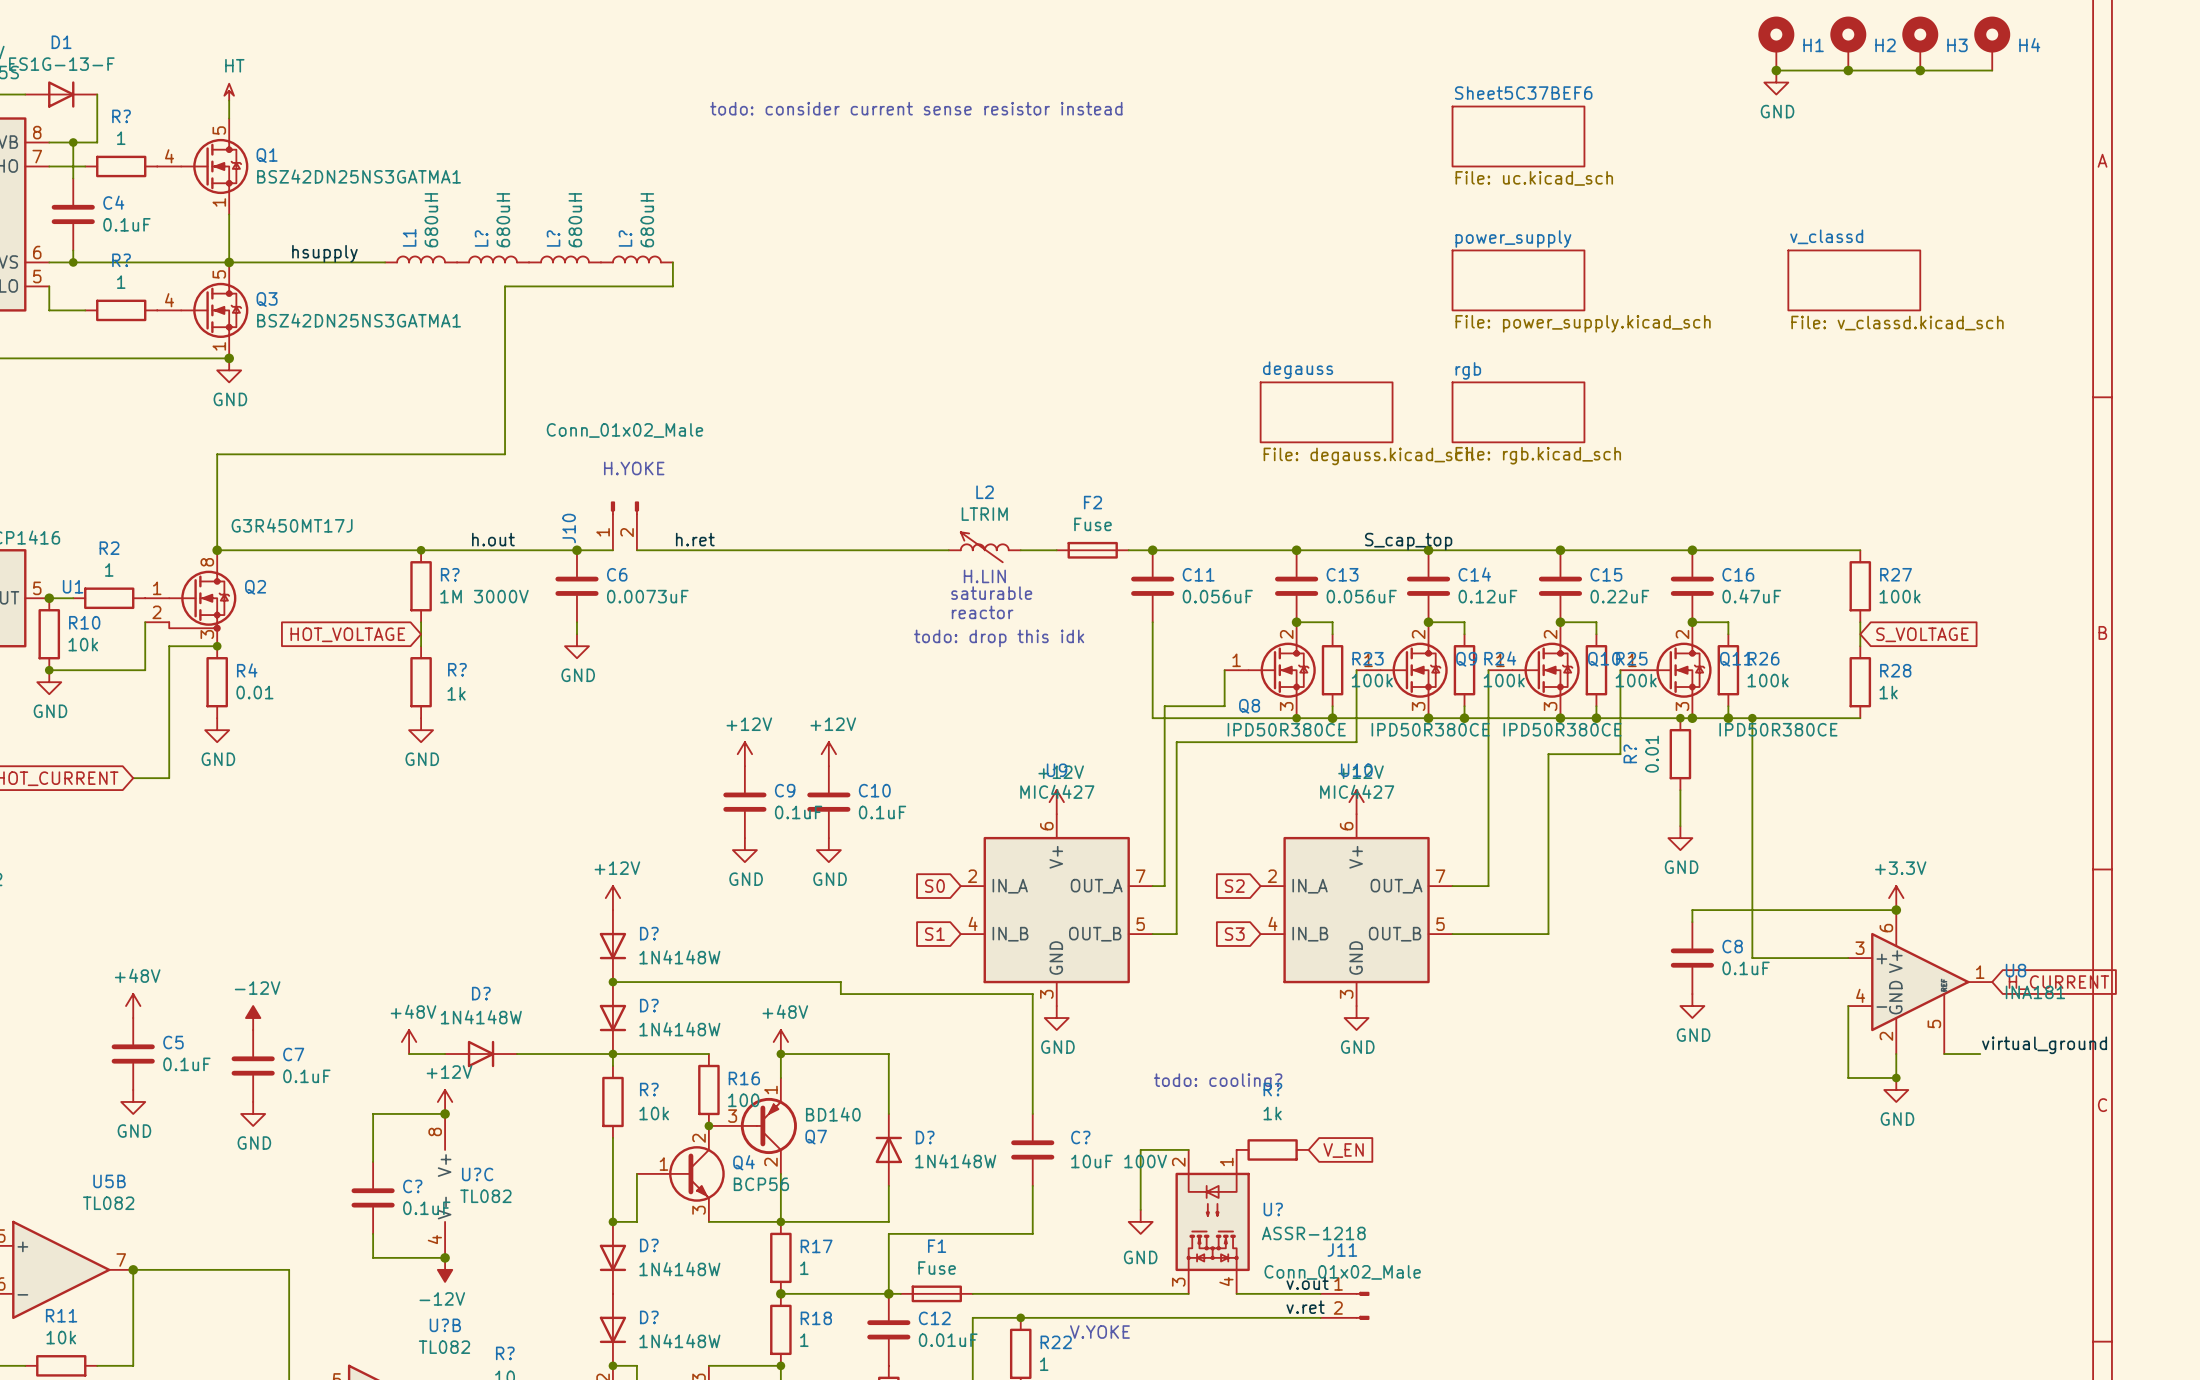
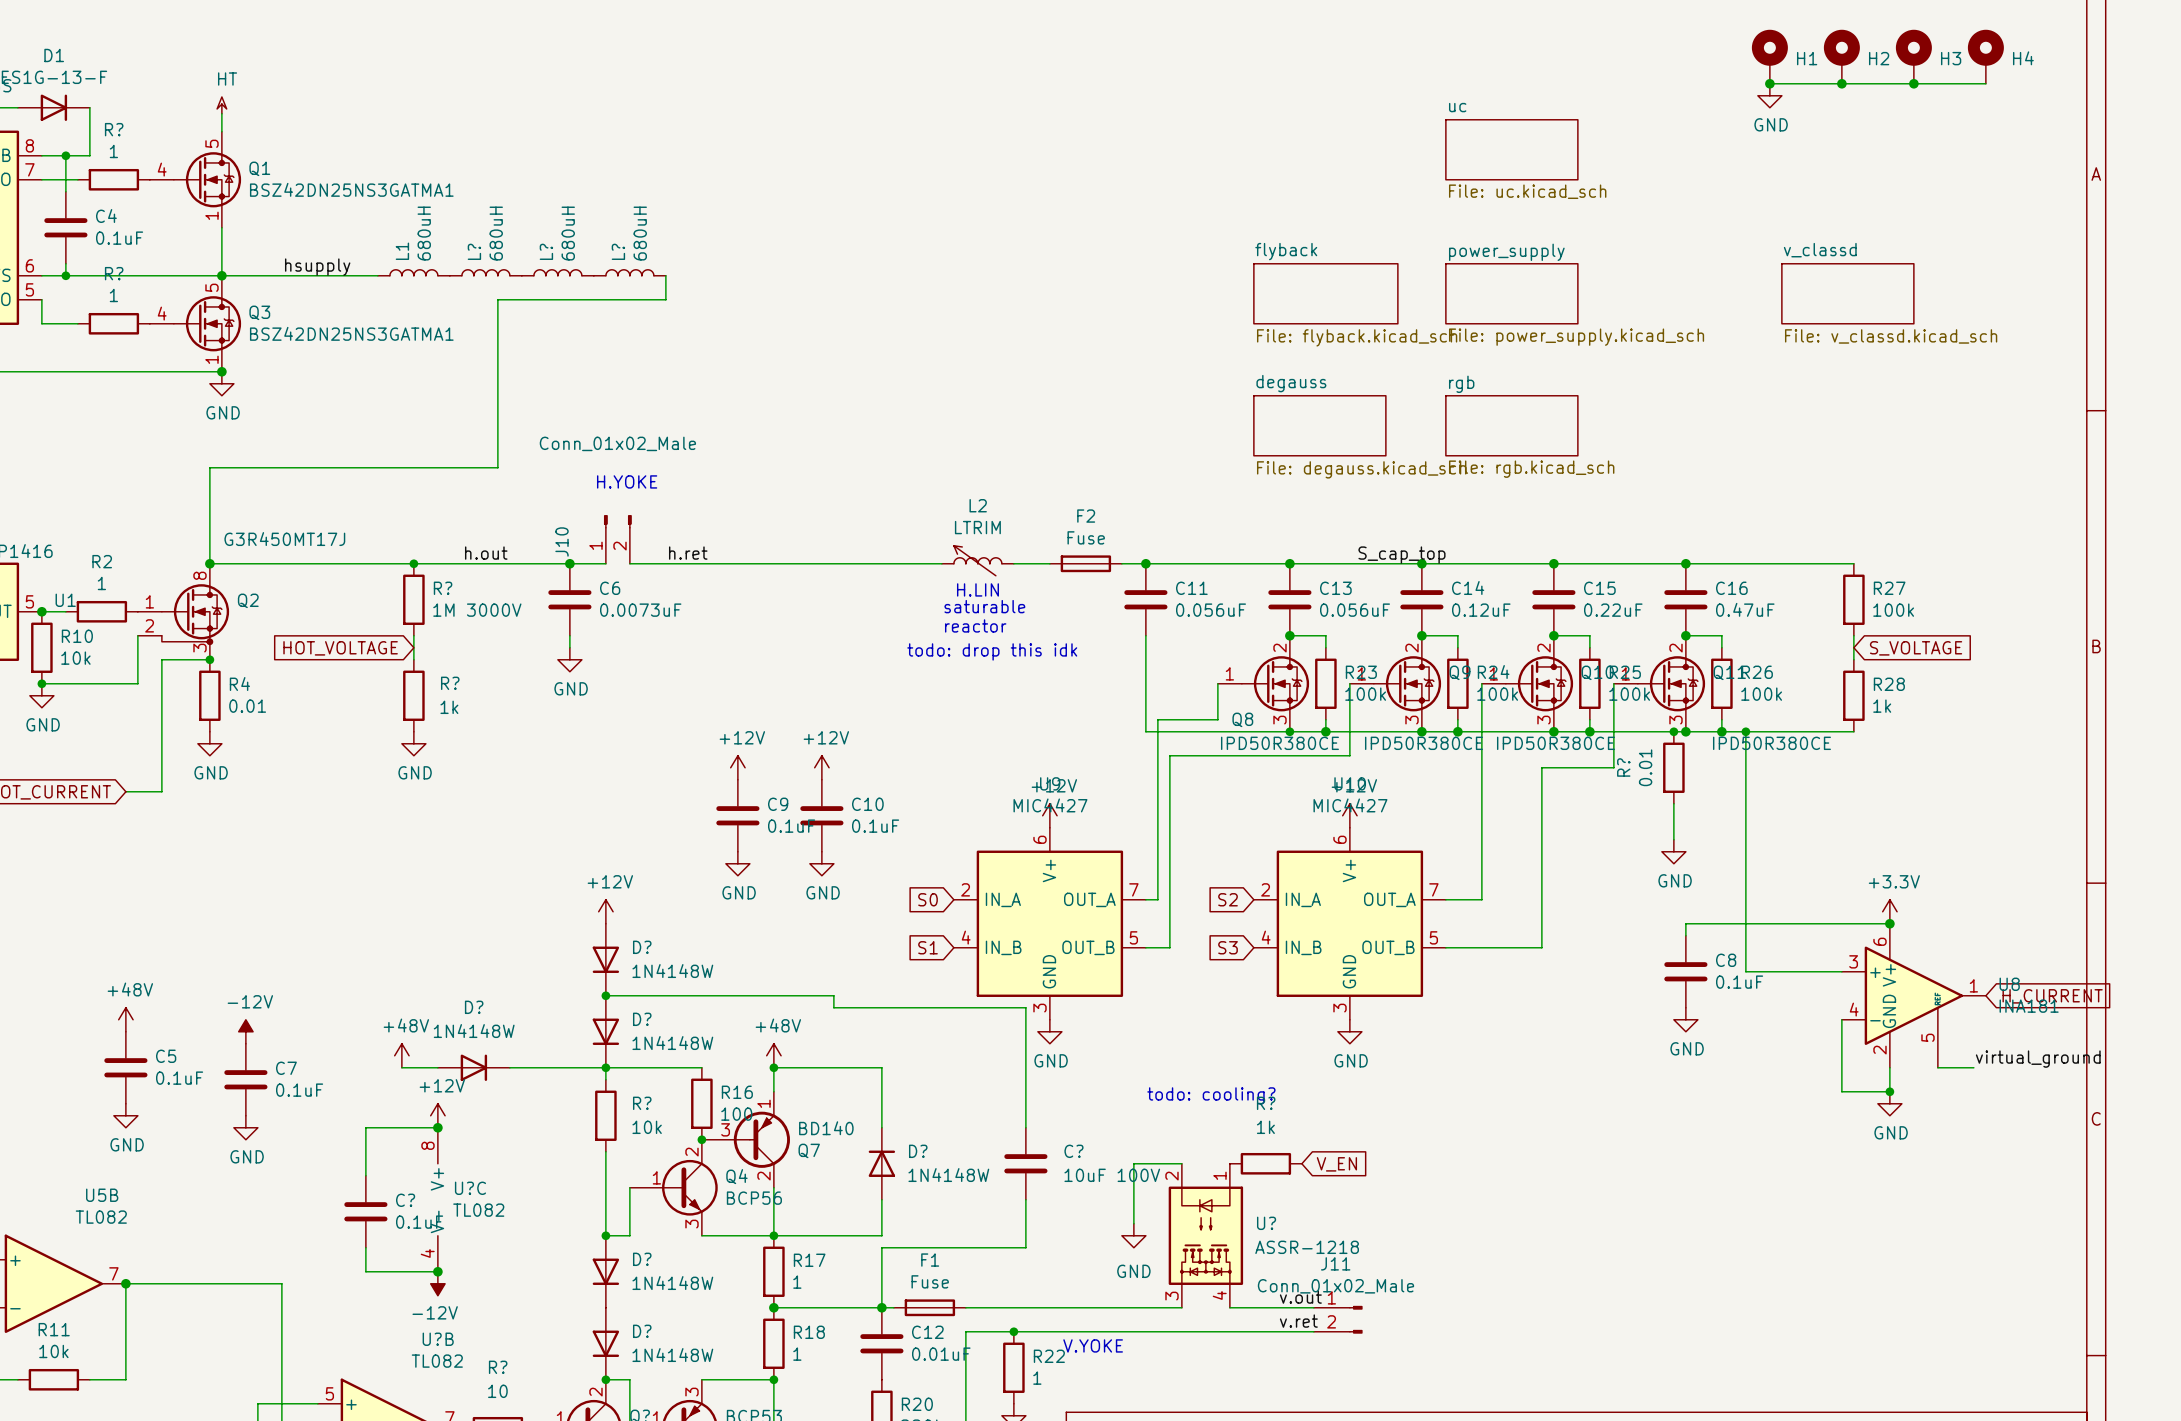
sheet Sheet5C37BEF6 name: Sheet5C37BEF6 (1523, 93) -> uc (1457, 107)
text: todo: consider current sense resistor instead (916, 108) -> none
sheet flyback: none -> File: flyback.kicad_sch (1325, 293)

